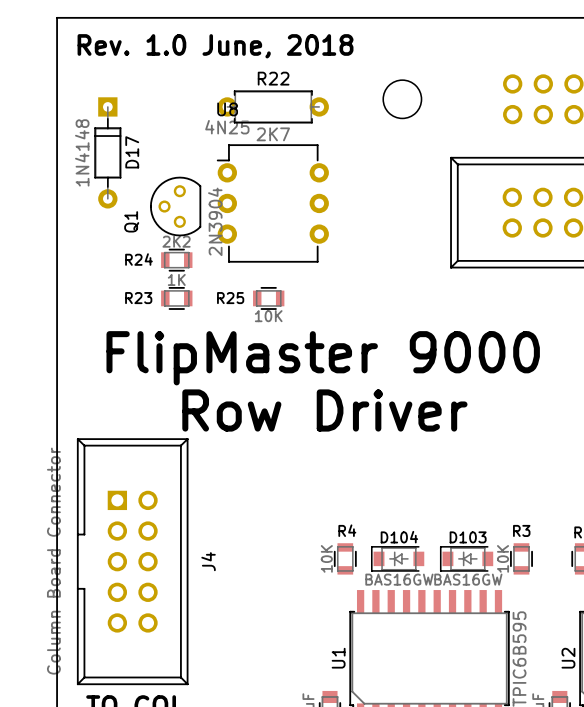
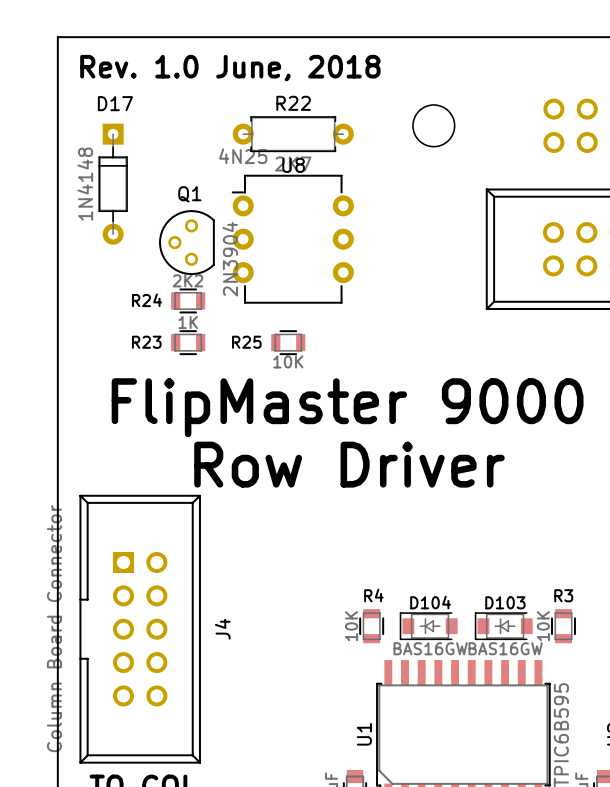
U8 name position: U8 (227, 109) -> U8 (293, 165)
D17 name rotation: 0° (132, 152) -> 90° clockwise (115, 103)
D17 name position: D17 (132, 152) -> D17 (115, 103)
Q1 name rotation: 0° (131, 221) -> 90° clockwise (189, 194)
Q1 name position: Q1 (131, 221) -> Q1 (189, 194)

